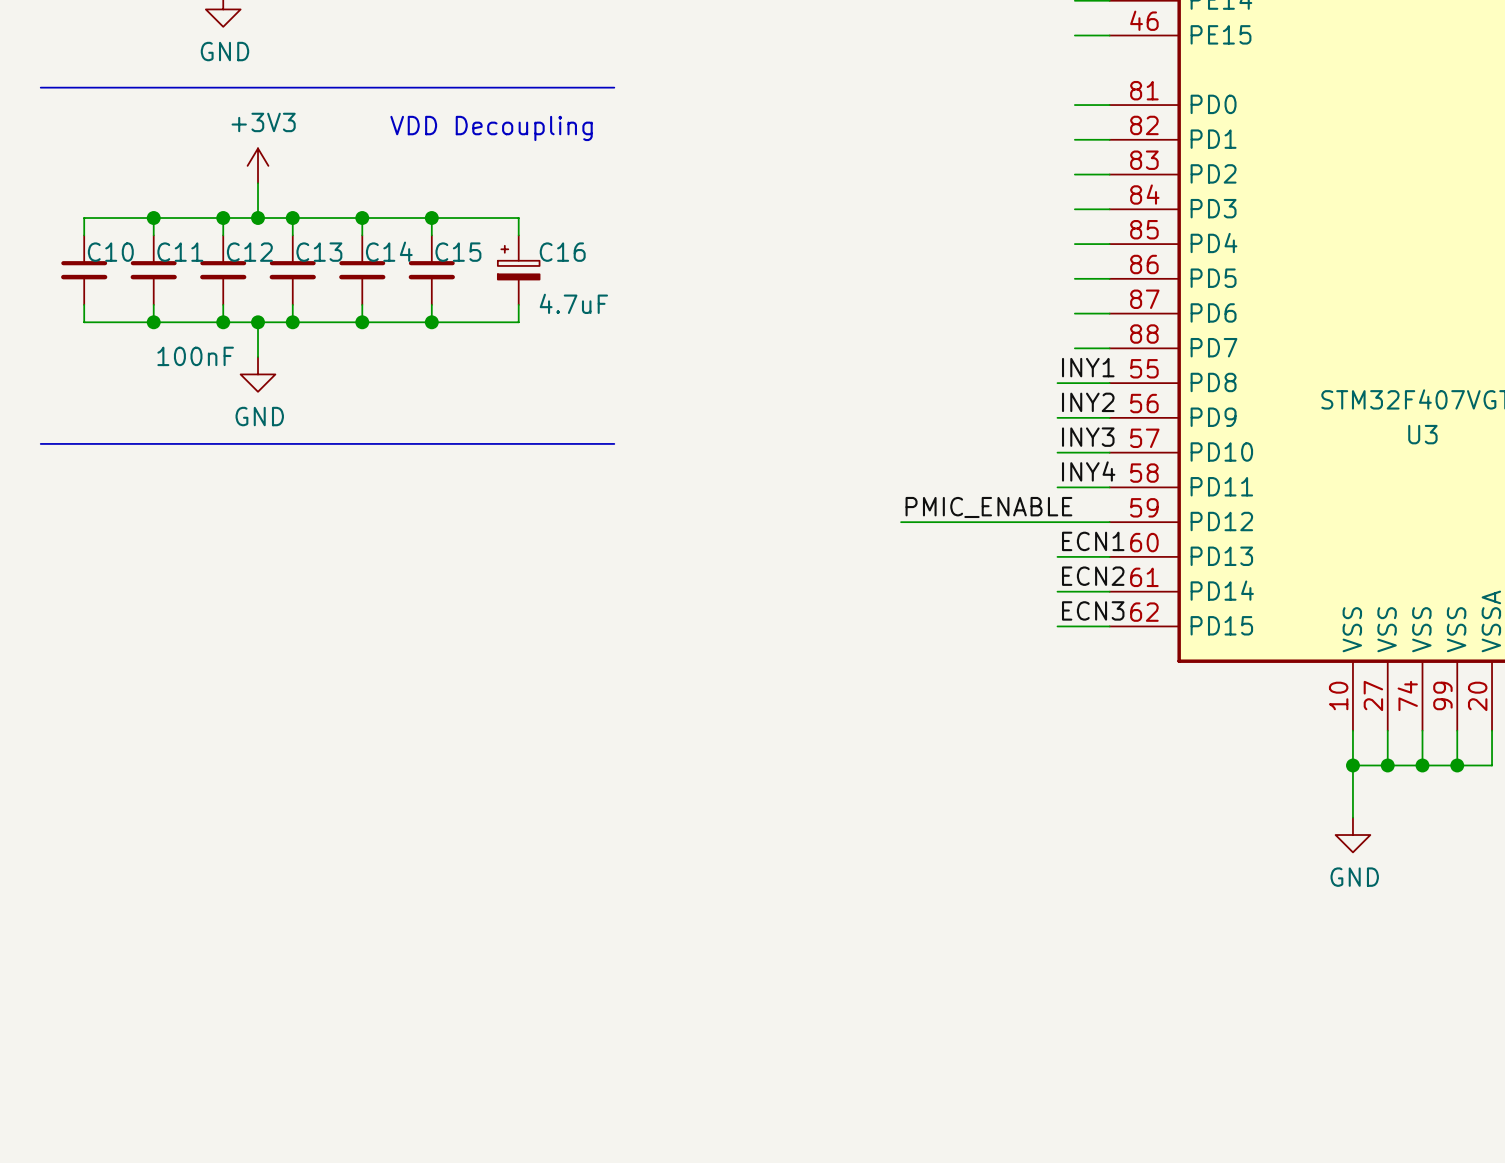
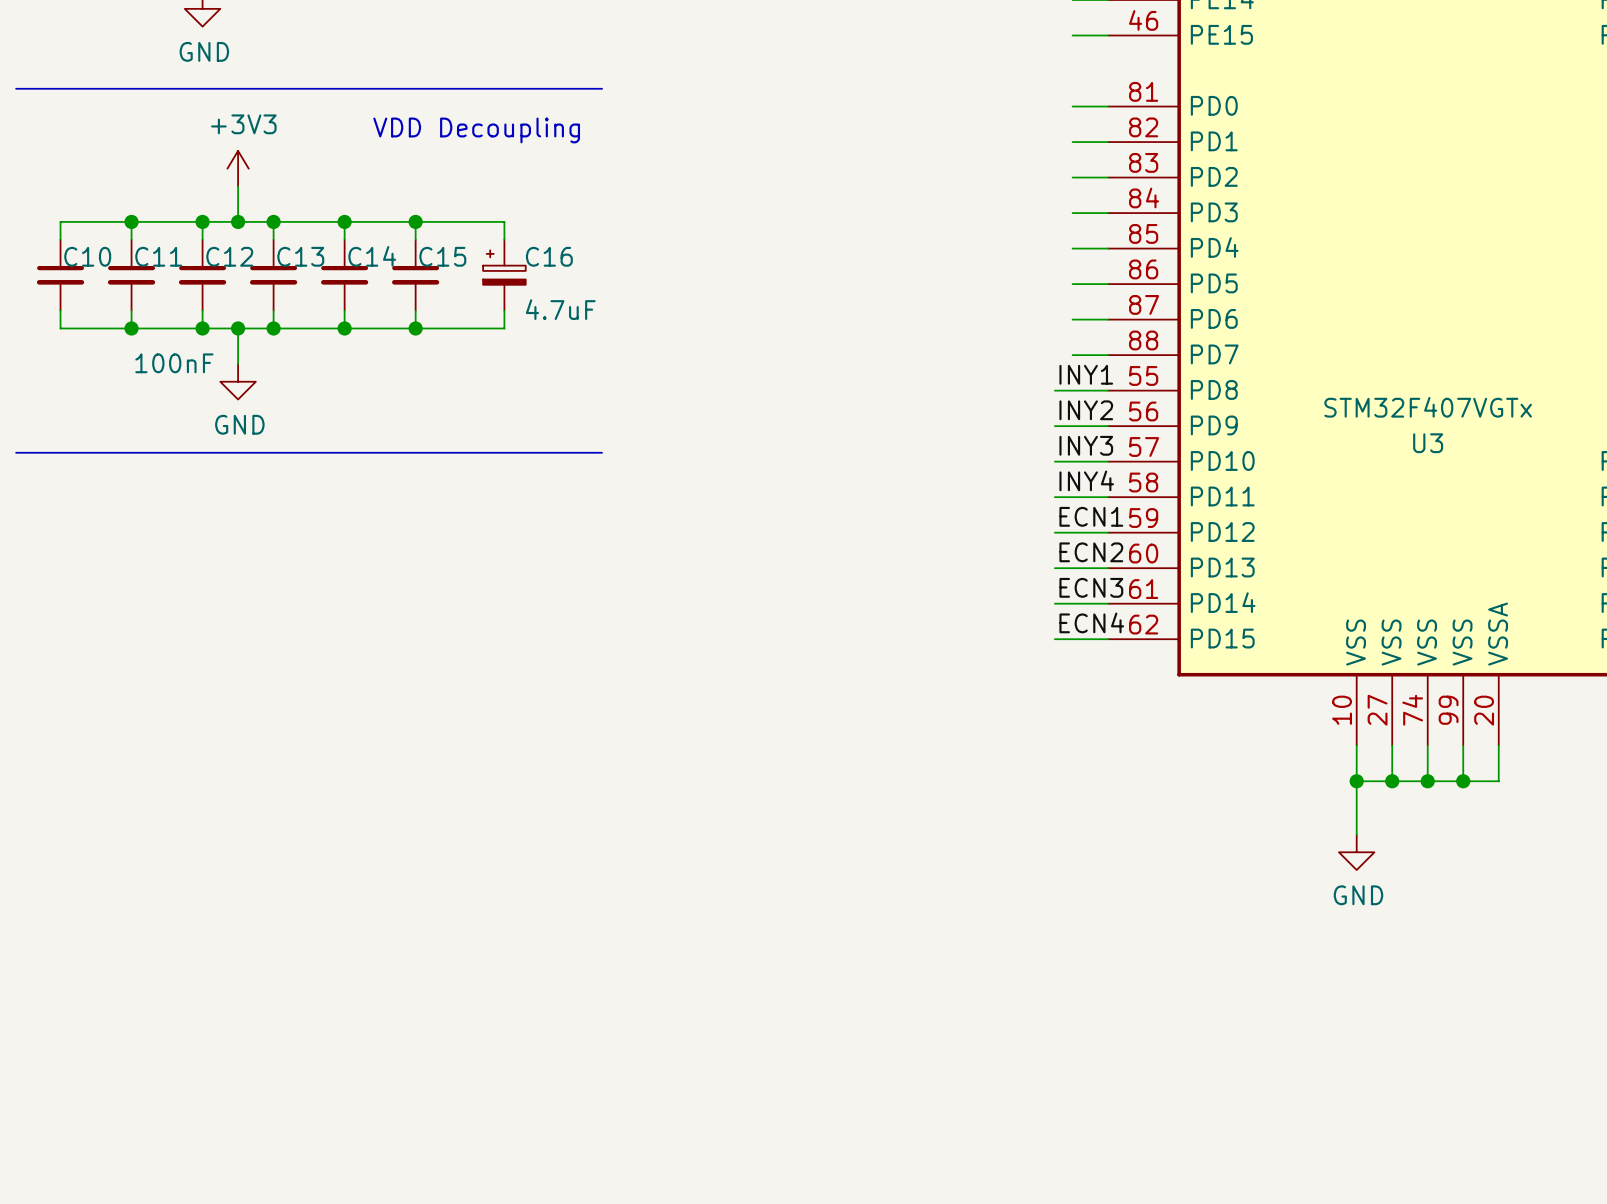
label: none -> ECN1 (1091, 516)
label: PMIC_ENABLE (988, 507) -> none
wire: (901, 522) (1057, 522) -> none
label: ECN1 (1093, 541) -> ECN2 (1091, 552)
label: ECN2 (1093, 576) -> ECN3 (1091, 587)
label: ECN3 (1093, 610) -> ECN4 (1091, 622)

